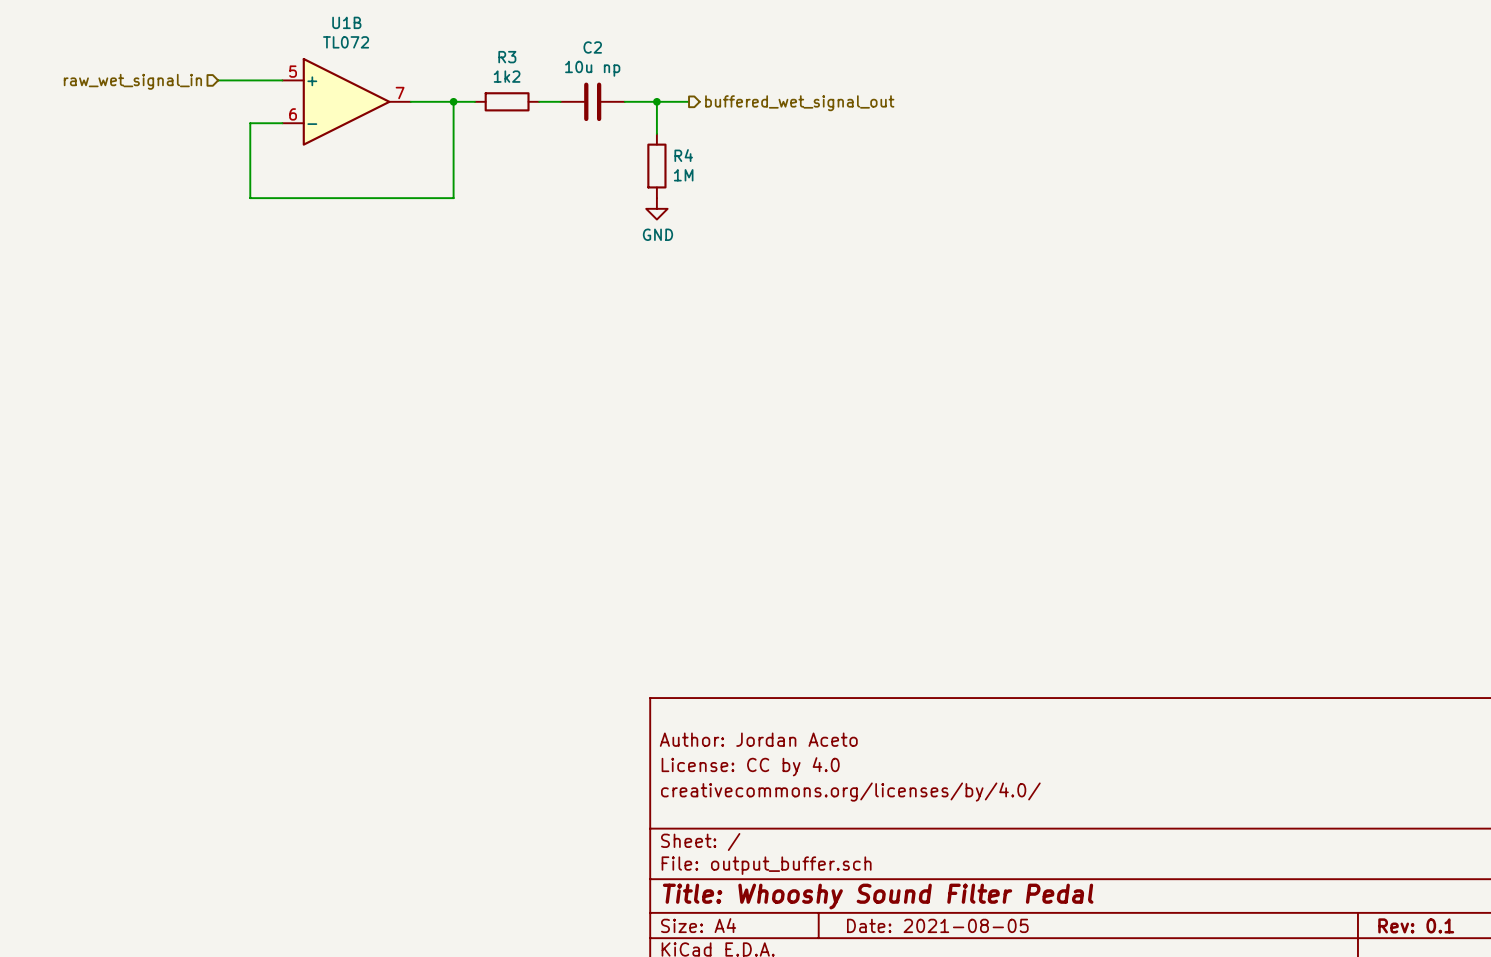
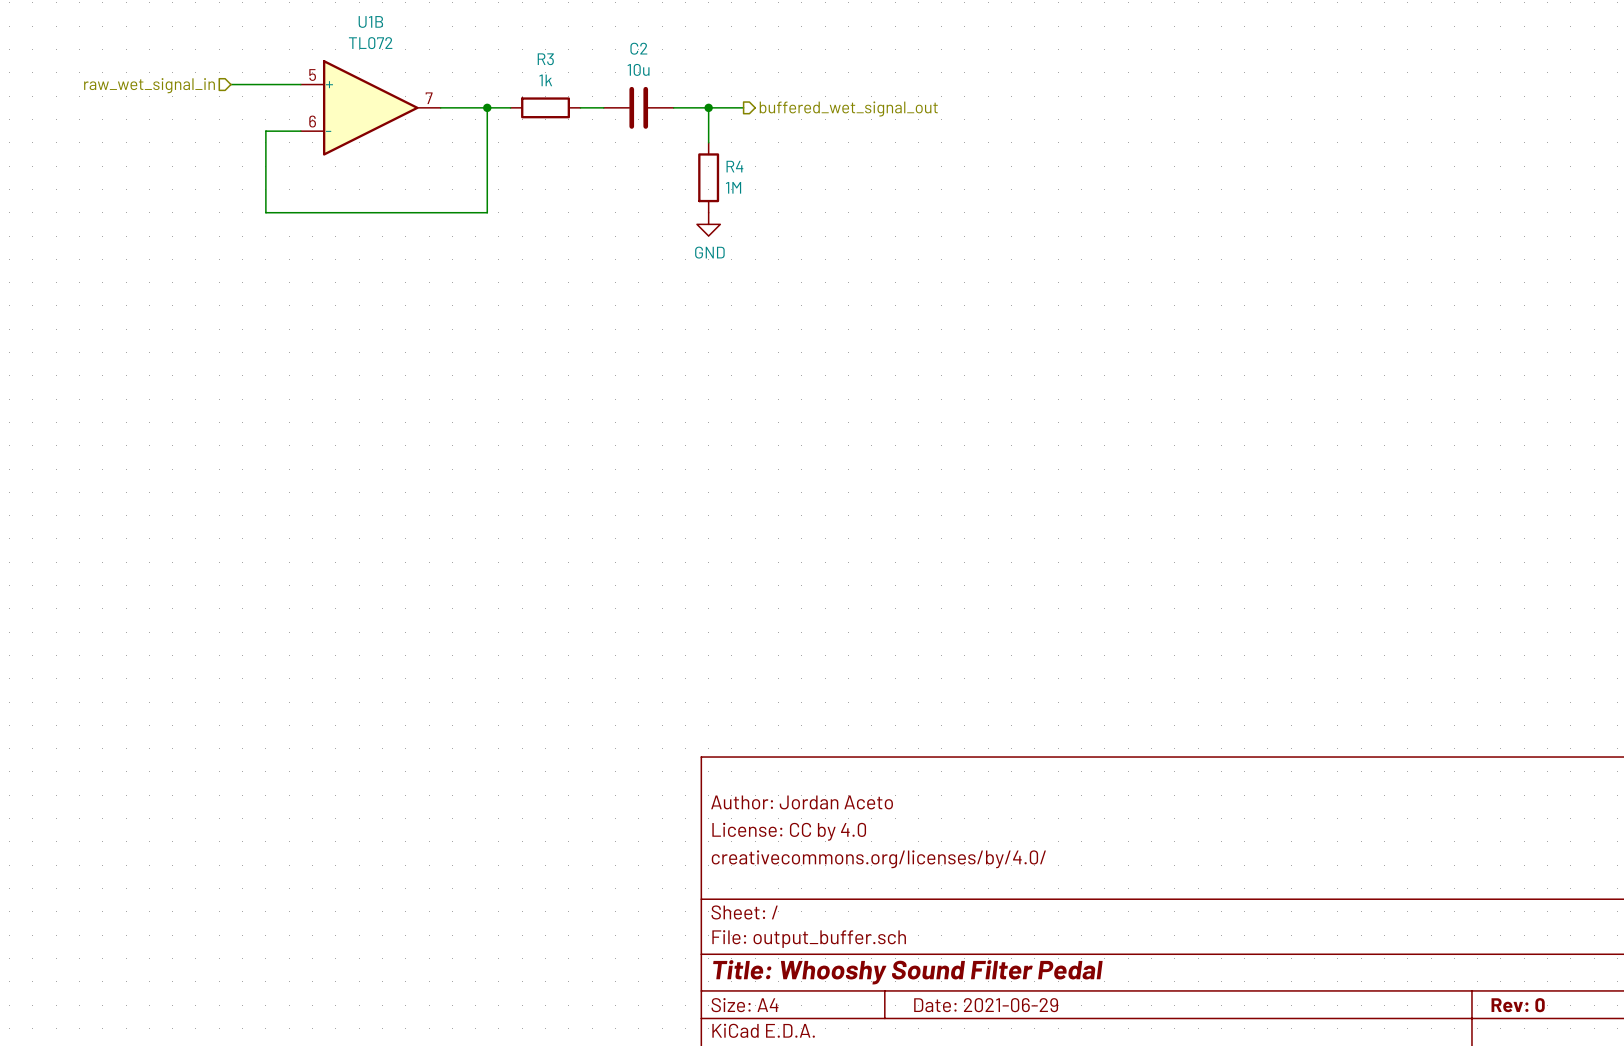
C2 value: 10u np (592, 68) -> 10u (638, 69)
R3 value: 1k2 (507, 76) -> 1k (545, 80)
title block: Date: 2021-08-05 (937, 925) -> Date: 2021-06-29 (986, 1005)
title block: Rev: 0.1 (1416, 925) -> Rev: 0 (1518, 1005)

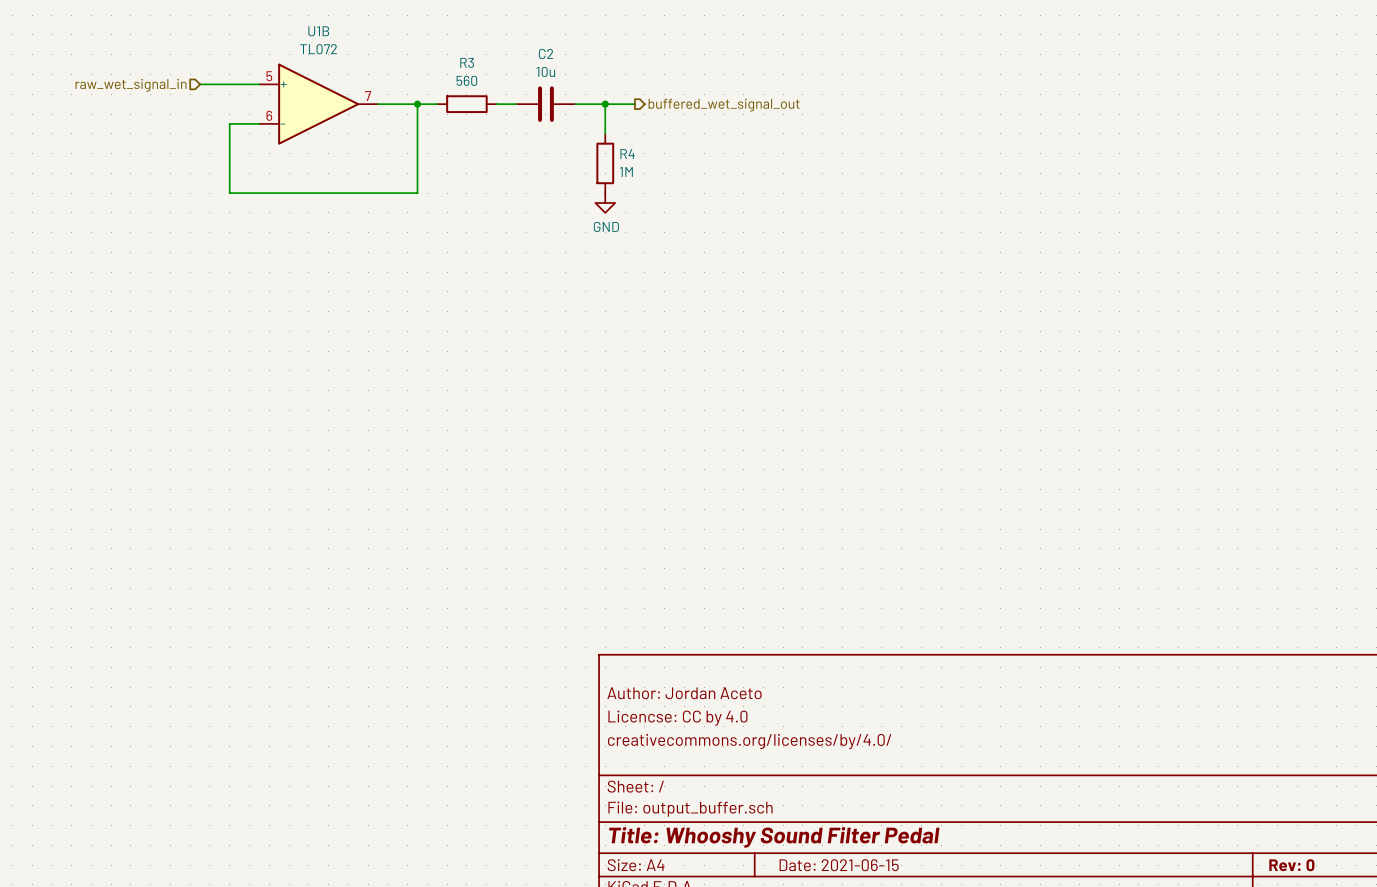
R3 value: 1k (545, 80) -> 560 (466, 80)
title block: License: CC by 4.0 (789, 831) -> Licencse: CC by 4.0 (677, 718)
title block: Date: 2021-06-29 (986, 1005) -> Date: 2021-06-15 (839, 865)

